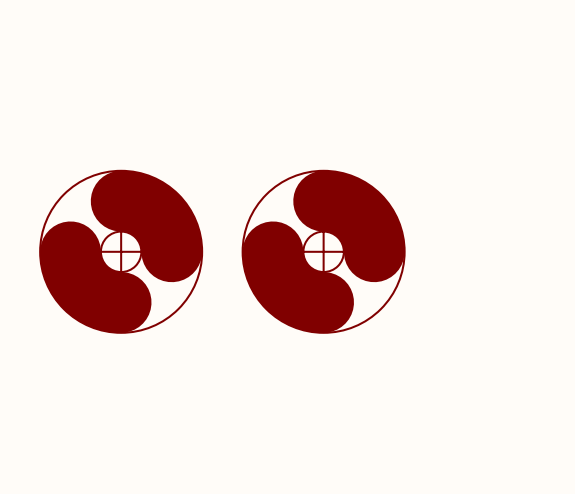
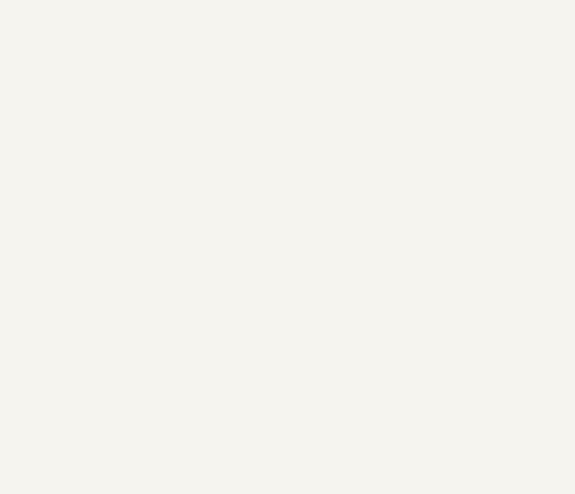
part: (121, 251) -> none
part: (323, 251) -> none

